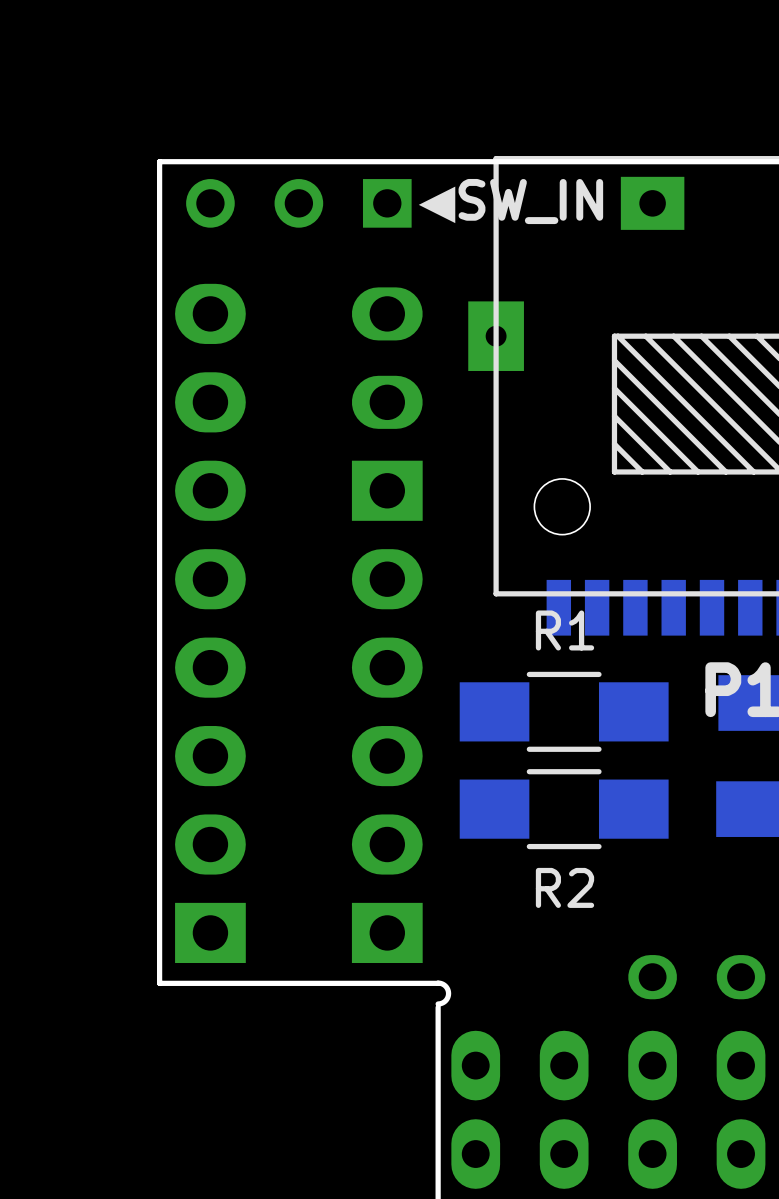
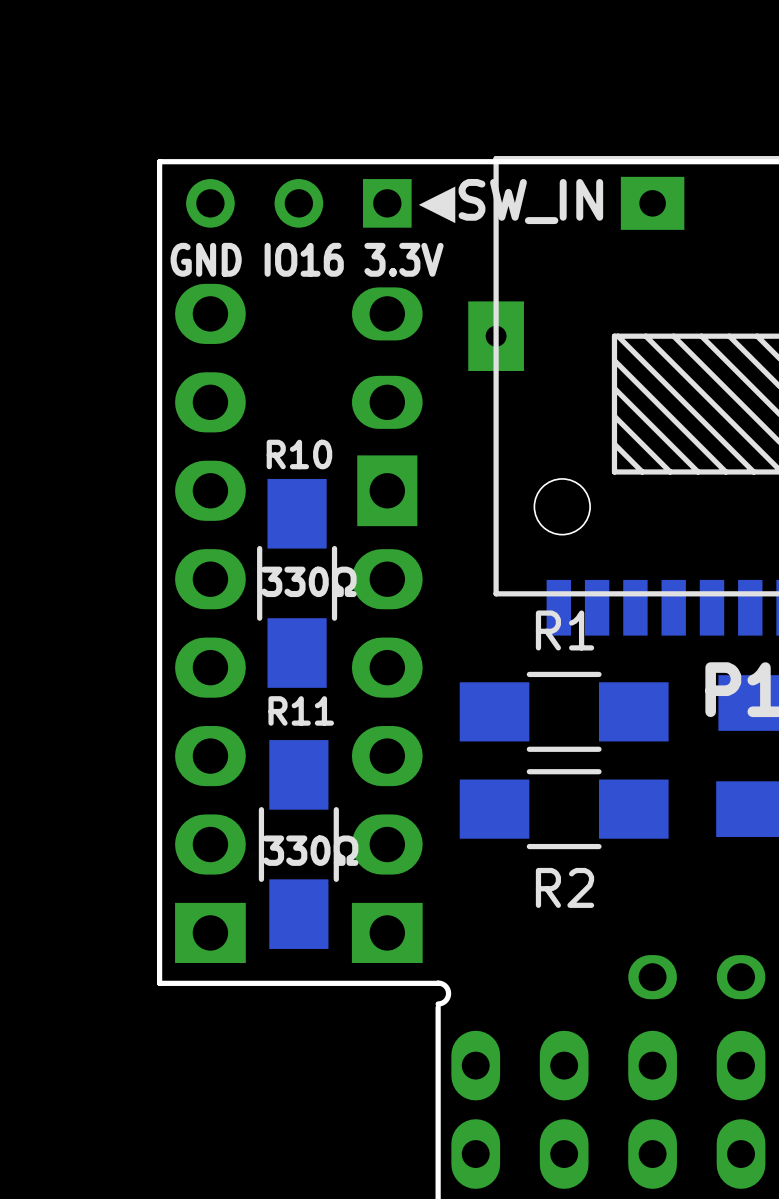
text: none -> GND IO16 3.3V (307, 259)
part footprint: [351, 287, 423, 521] -> [351, 287, 423, 527]
text: none -> 330Ω (308, 581)
R10: none -> (297, 583)
R11: none -> (298, 844)
text: none -> 330Ω (310, 850)

